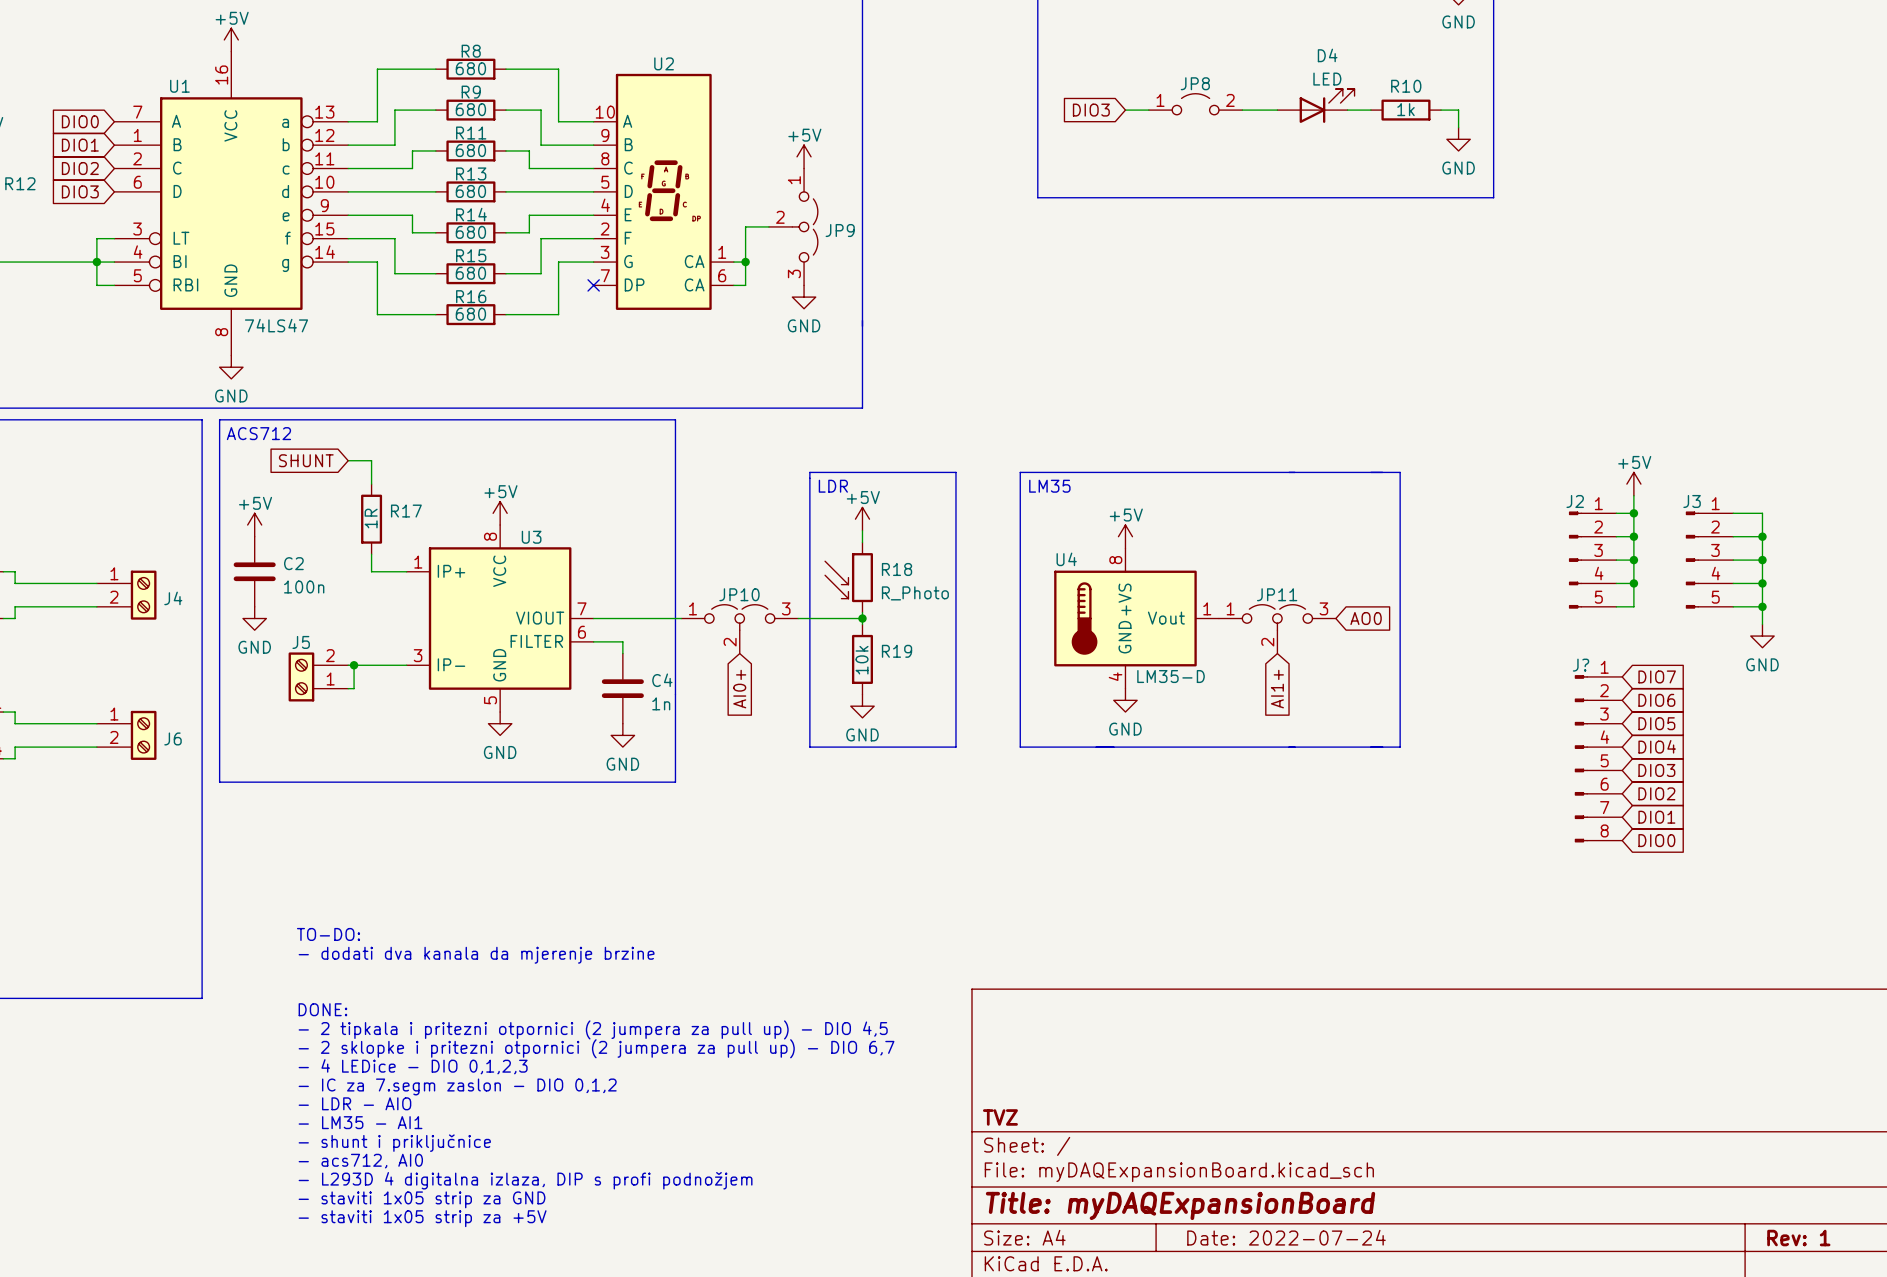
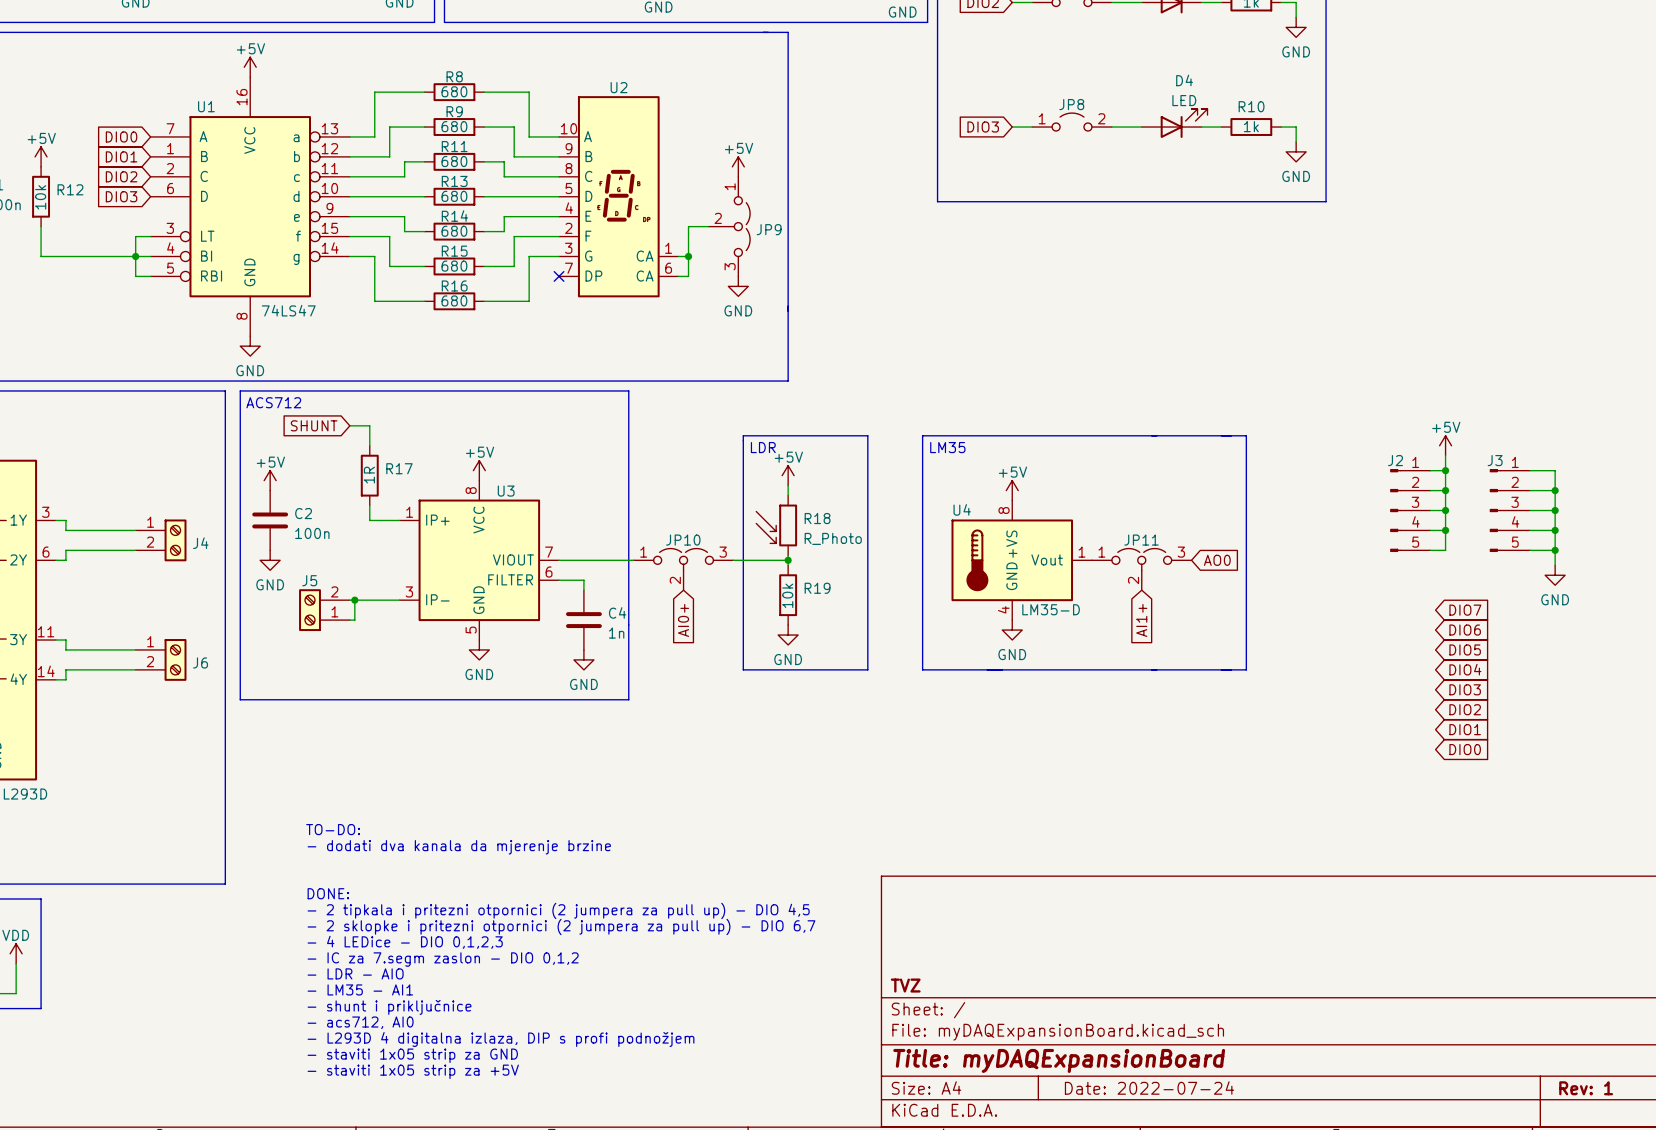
J?: (1598, 758) -> none

